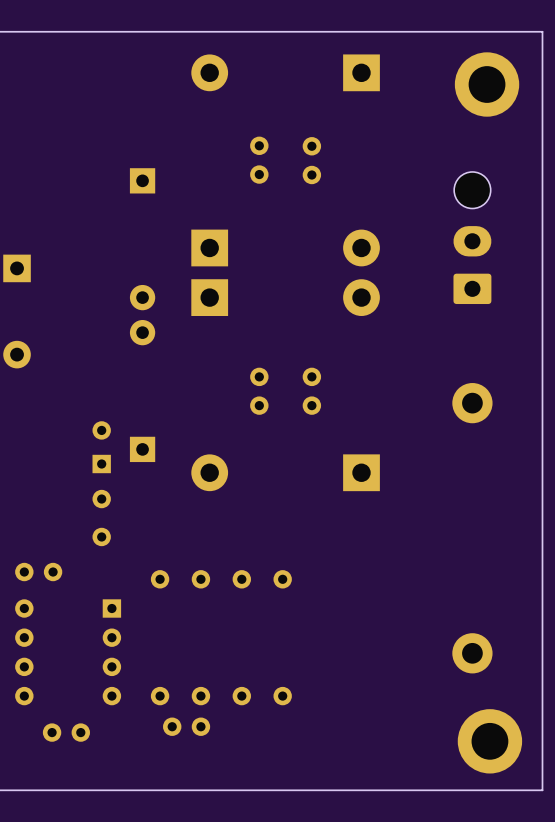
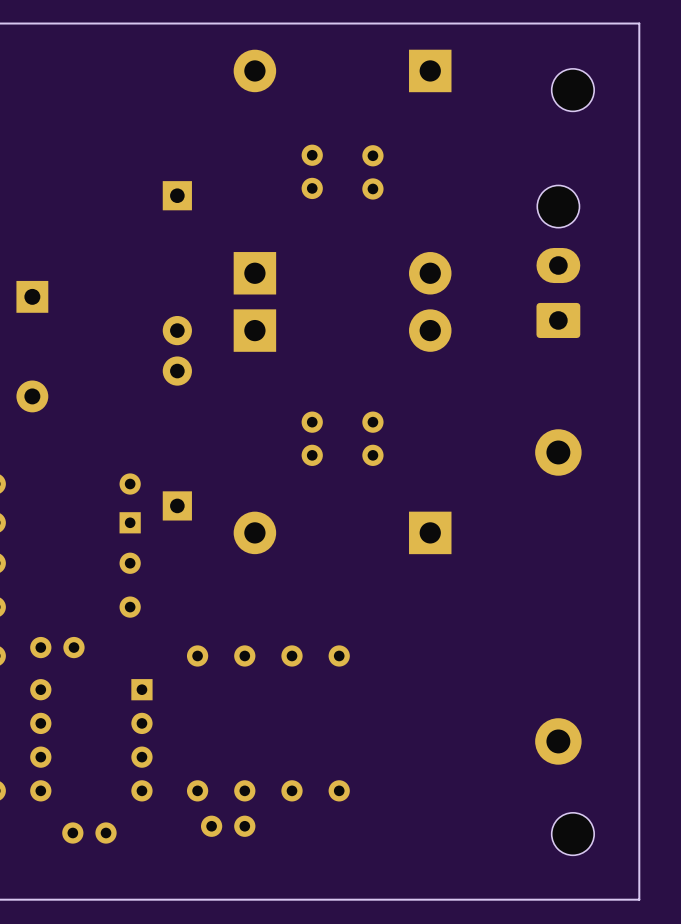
part footprint: [454, 52, 520, 117] -> [551, 68, 595, 112]
part footprint: [457, 709, 523, 774] -> [551, 812, 595, 856]

